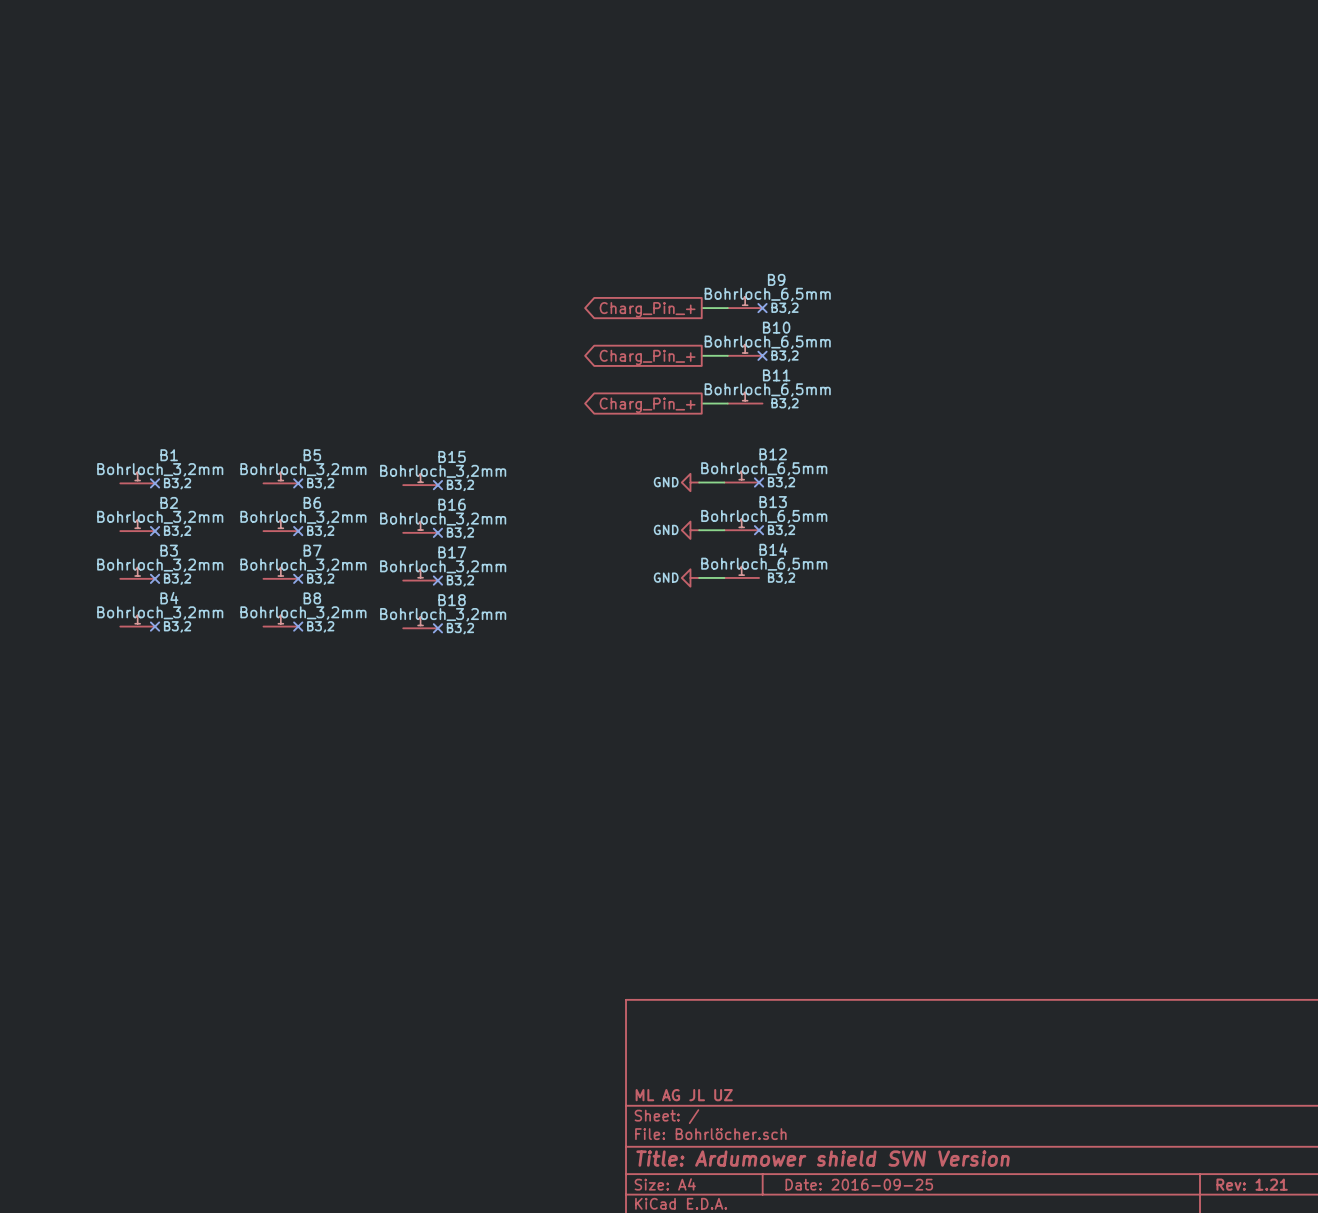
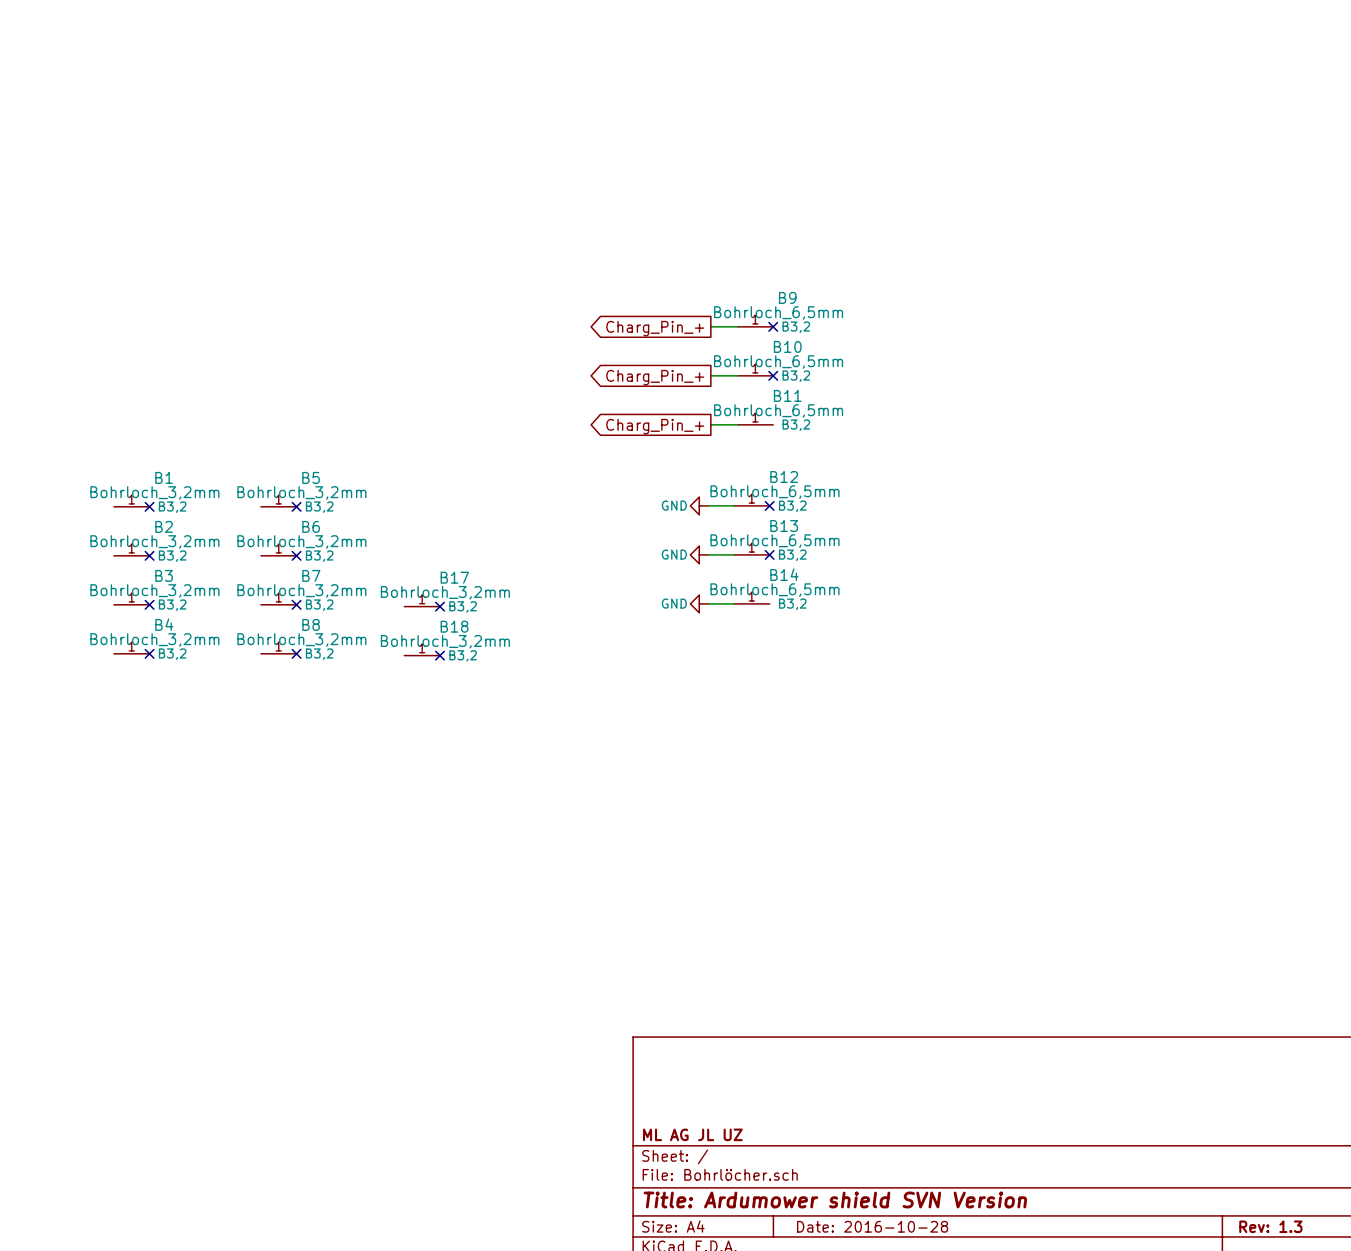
B15: Bohrloch_3,2mm (420, 485) -> none
no-connect mark: (437, 485) -> none
B16: Bohrloch_3,2mm (420, 532) -> none
no-connect mark: (437, 532) -> none
title block: Date: 2016-09-25 (859, 1184) -> Date: 2016-10-28 (872, 1226)
title block: Rev: 1.21 (1252, 1184) -> Rev: 1.3 (1270, 1226)

